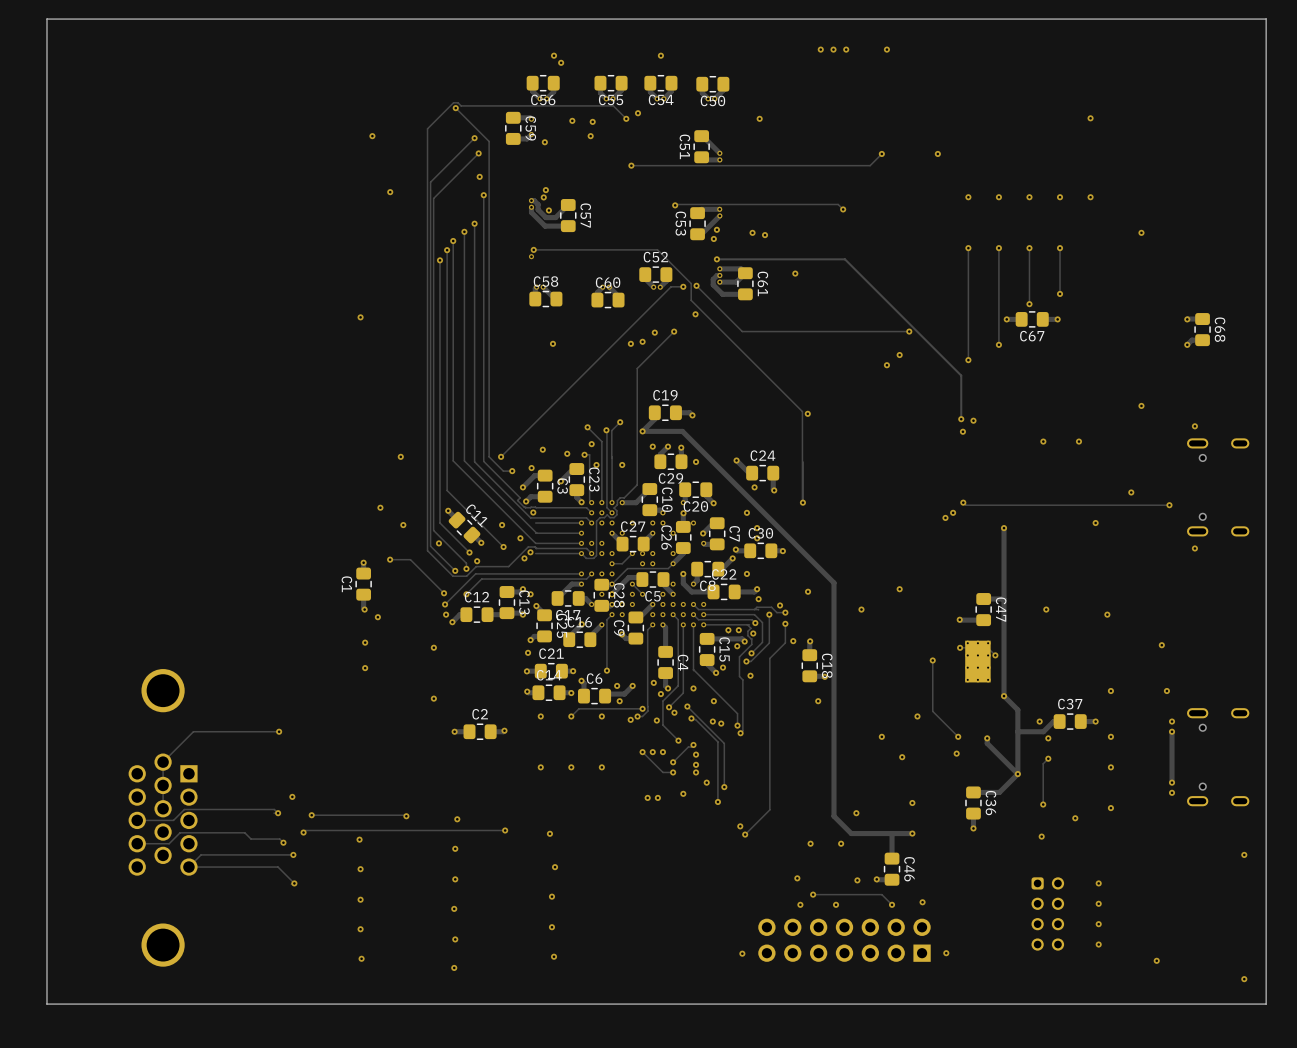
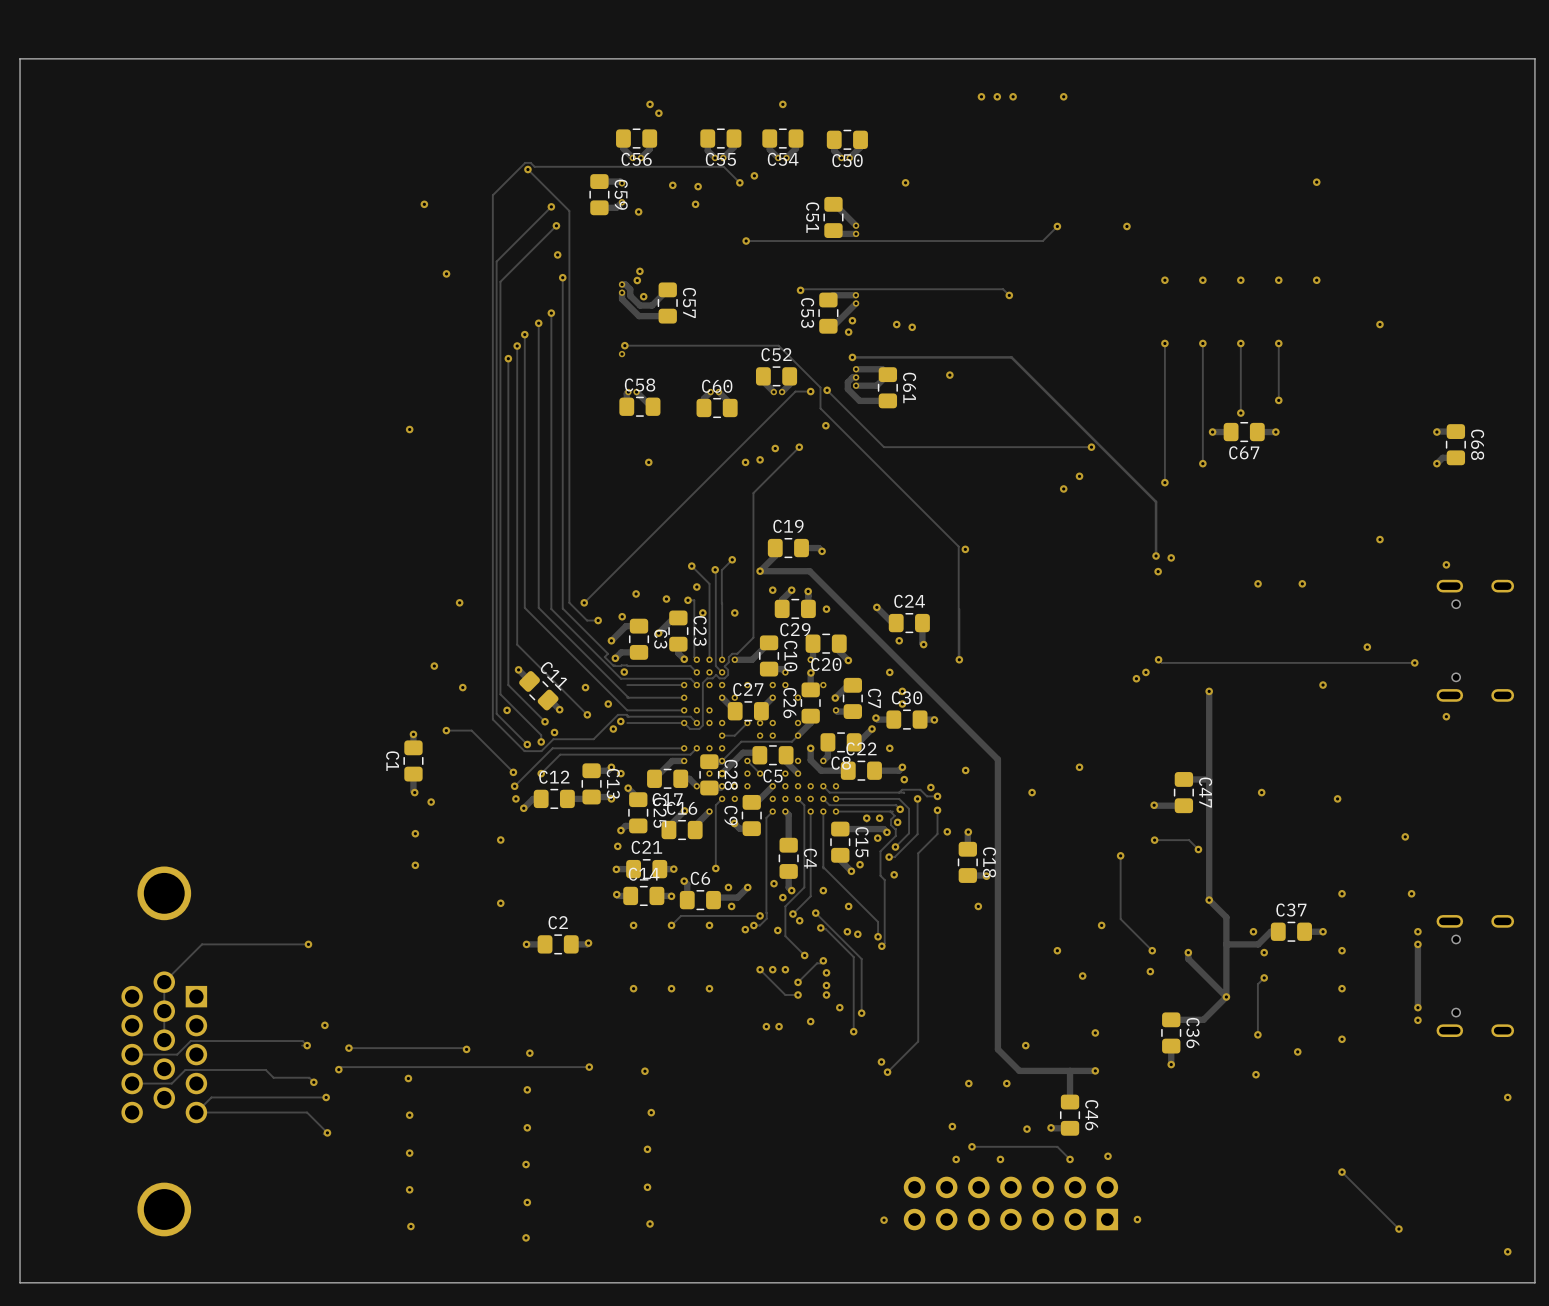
part: (977, 661) -> none
via: (1098, 883) -> none
via: (1098, 903) -> none
part: (1047, 913) -> none
track: none -> (1342, 1172) (1398, 1229)
via: none -> (1342, 1172)
via: (1098, 924) -> none
via: (1098, 944) -> none

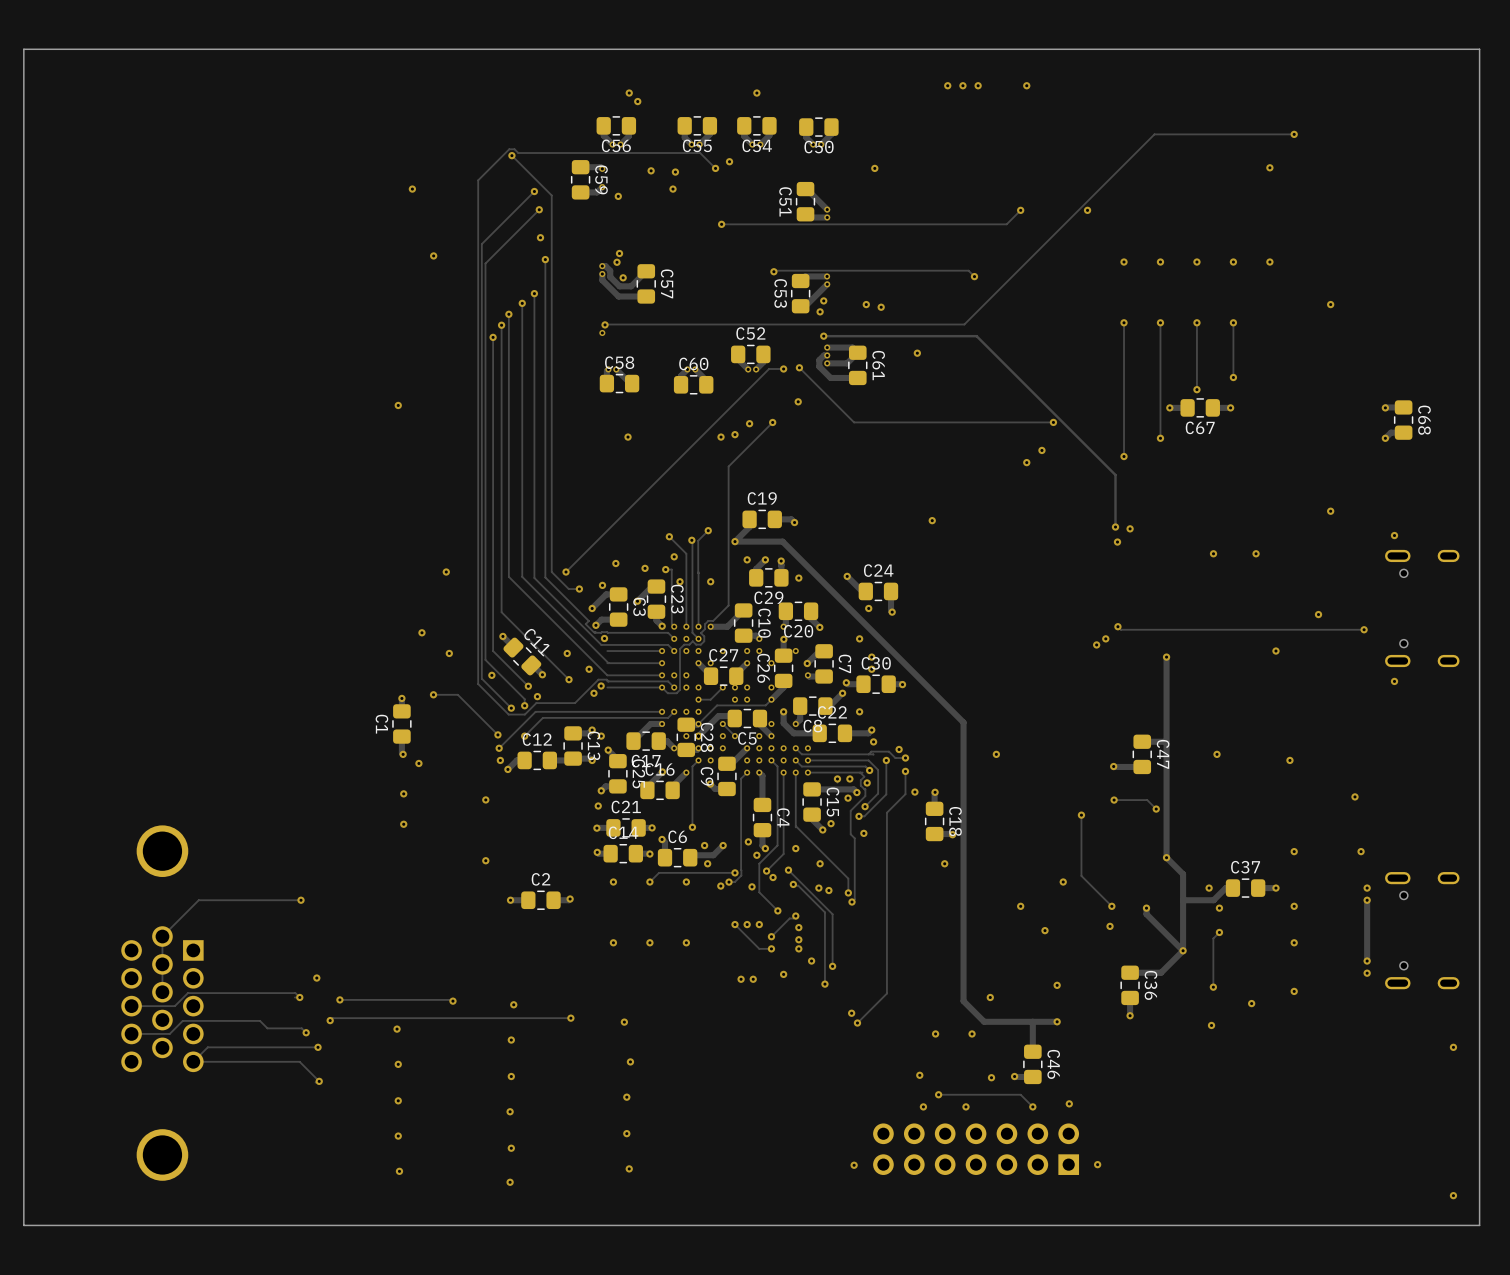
track: none -> (1294, 134) (1154, 134) (964, 324) (602, 324)
via: none -> (1294, 134)
track: (624, 345) (778, 345) (820, 387) (820, 408) (958, 546) (959, 659) (959, 609) -> none
via: (959, 659) -> none
via: (1079, 767) -> none
via: (965, 770) -> none
track: (1342, 1172) (1398, 1229) -> none
via: (1342, 1172) -> none
via: (1398, 1229) -> none

